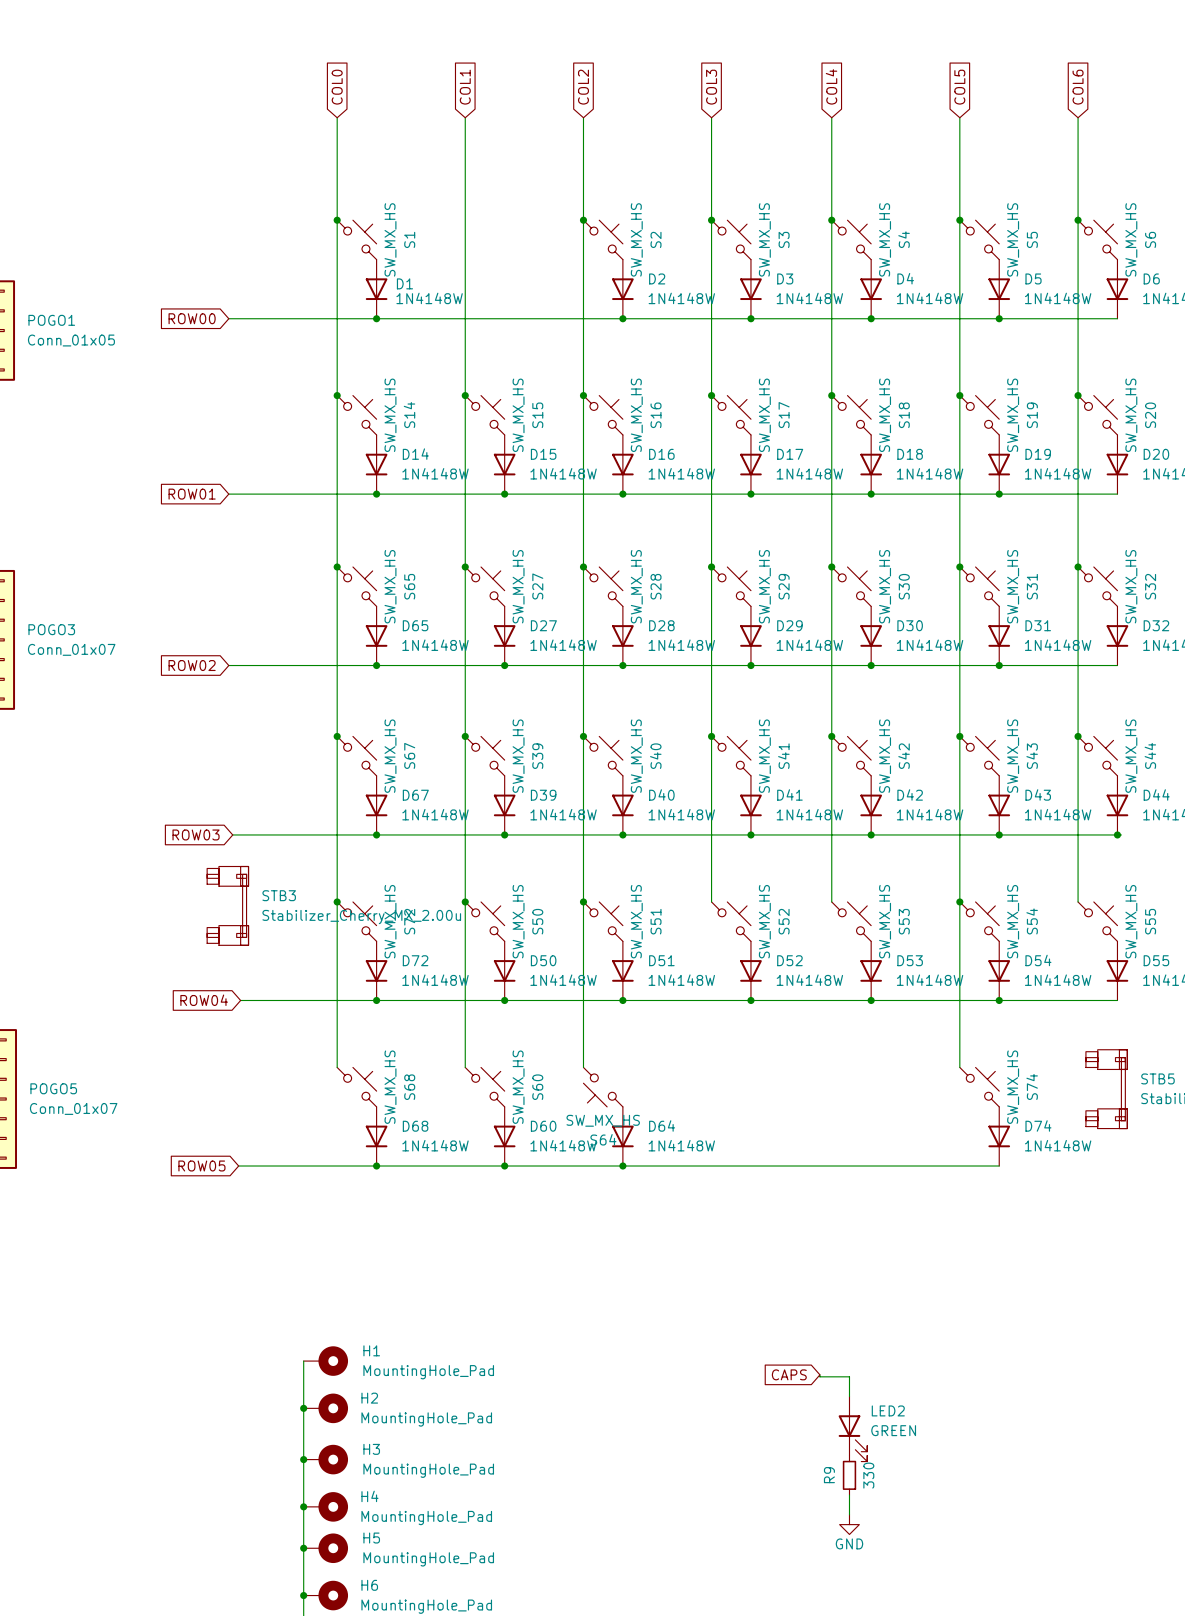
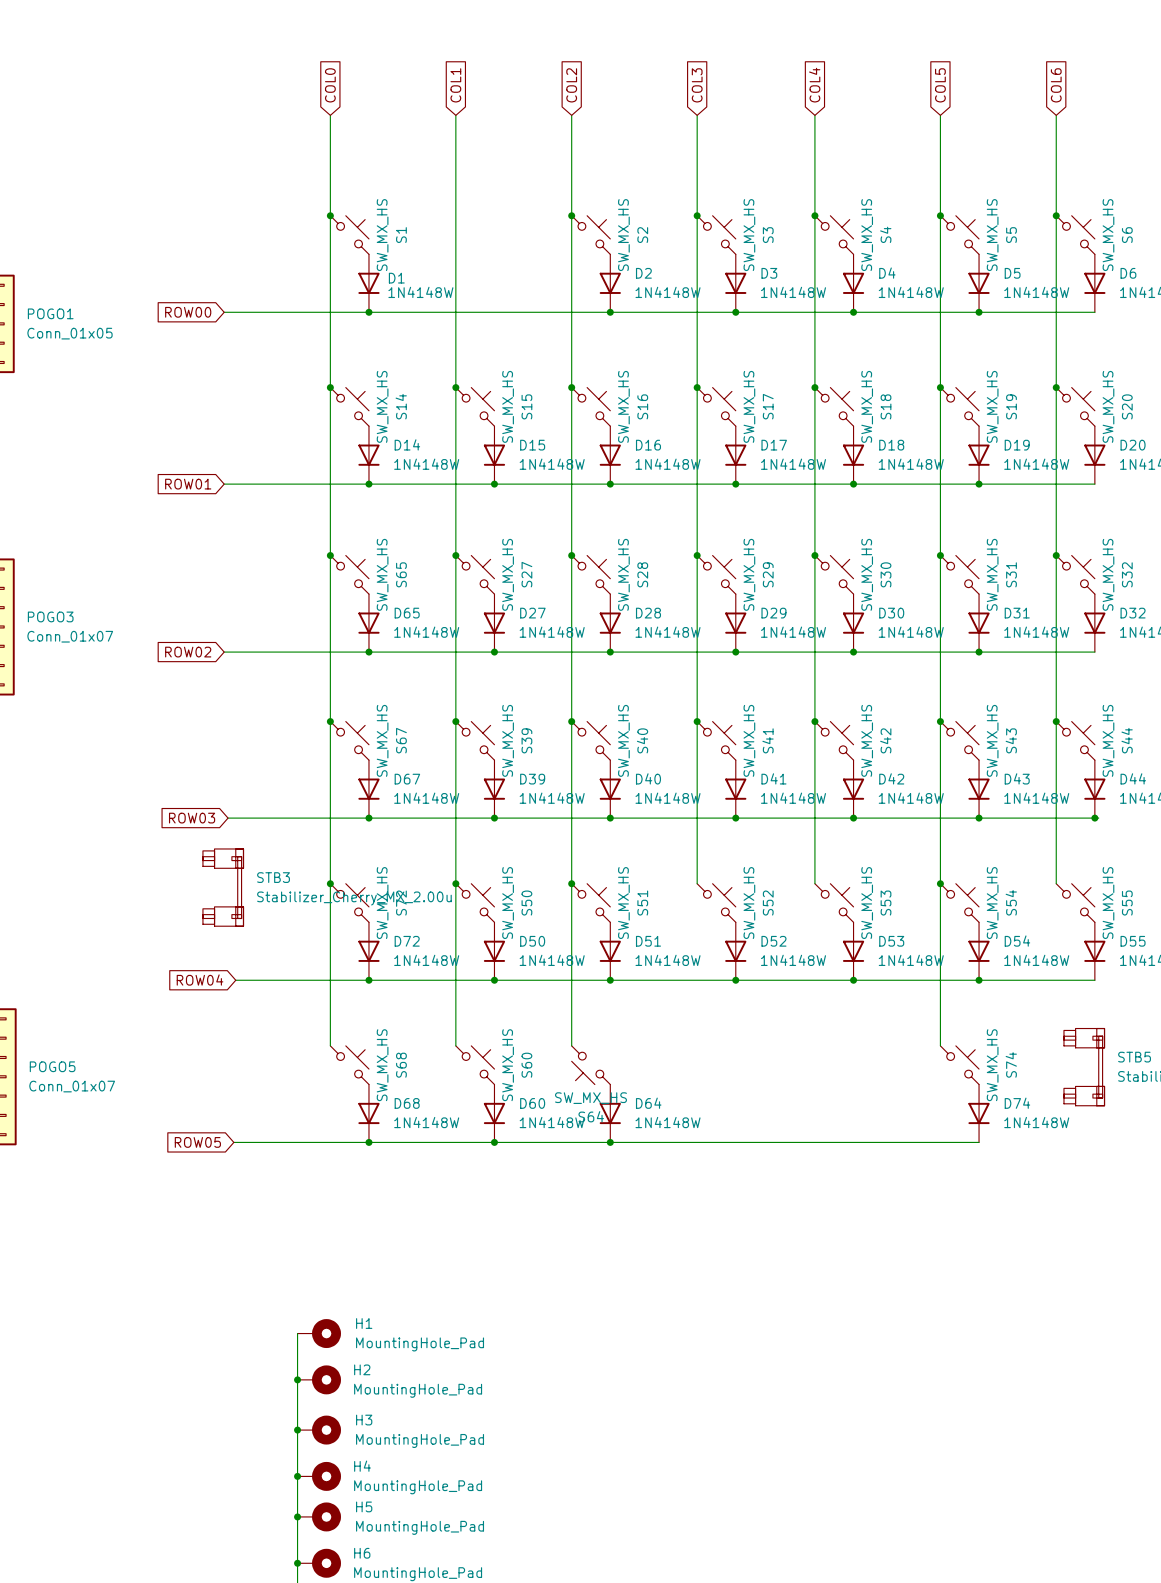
global label: CAPS (789, 1374) -> none
wire: (819, 1374) (819, 1376) (849, 1376) (849, 1396) -> none
LED2: GREEN (852, 1429) -> none
R9: 330 (849, 1475) -> none
wire: (849, 1495) (849, 1514) -> none
power symbol: GND (849, 1524) -> none

